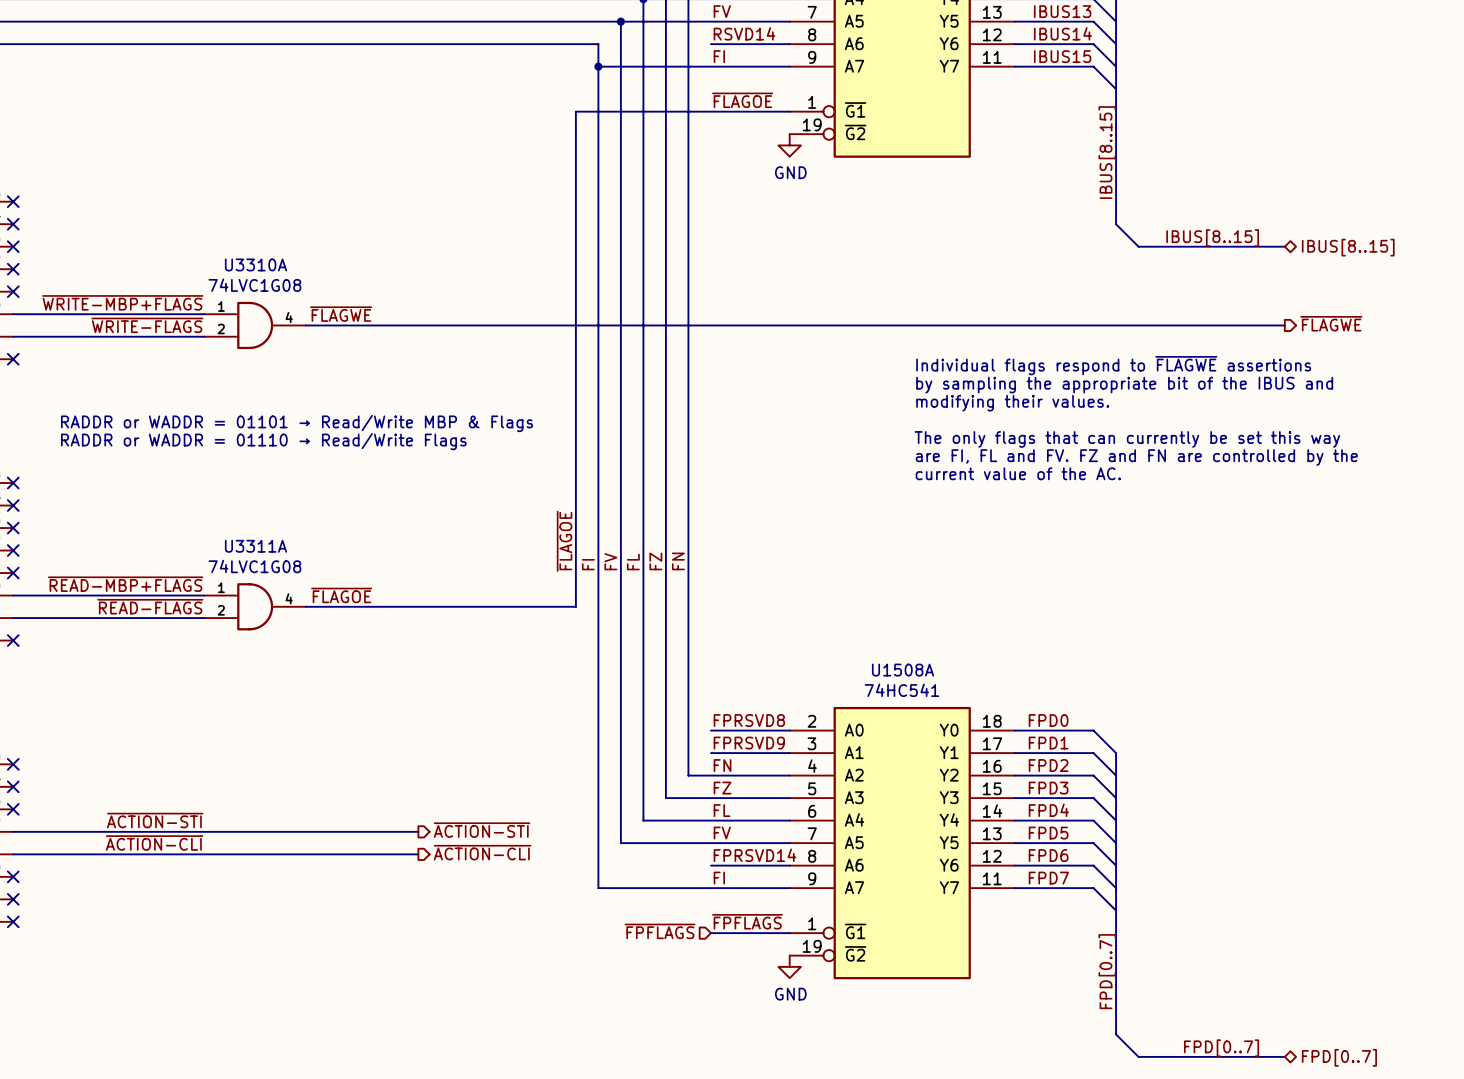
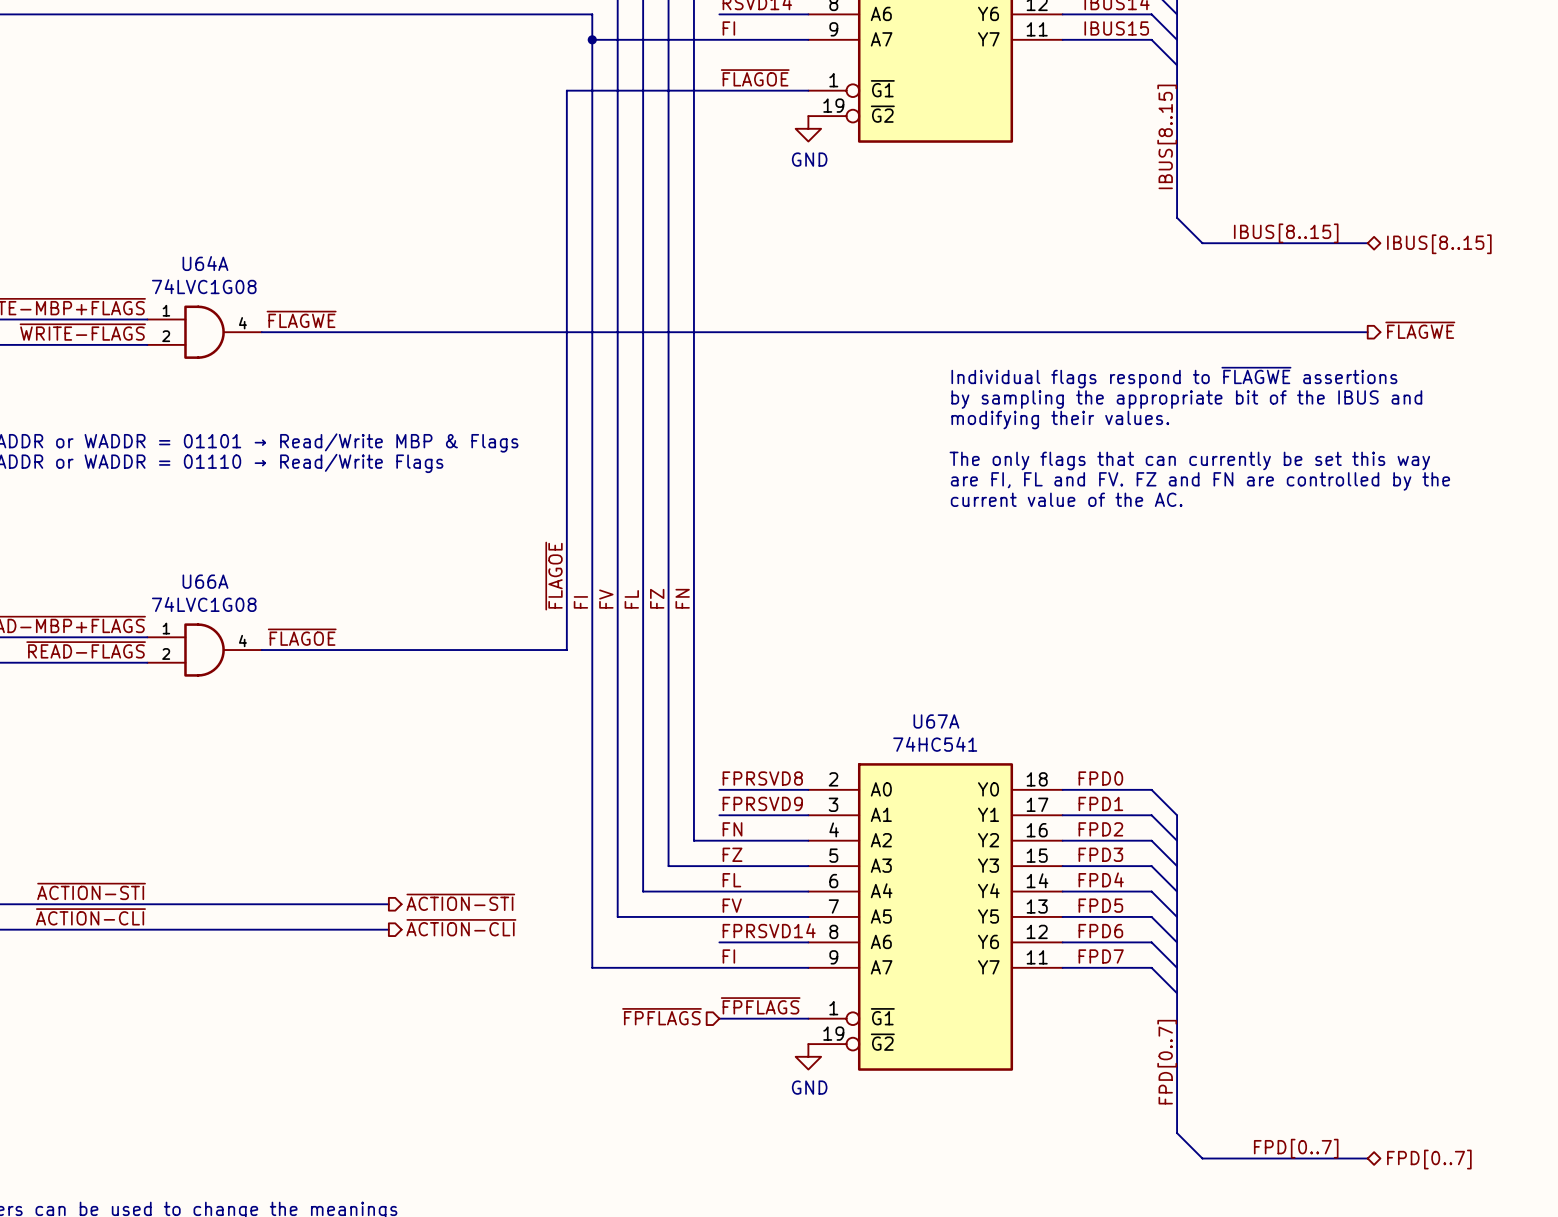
U3310A name: U3310A (255, 264) -> U64A (205, 263)
U3311A name: U3311A (255, 546) -> U66A (205, 581)
U1508A name: U1508A (903, 670) -> U67A (936, 721)

